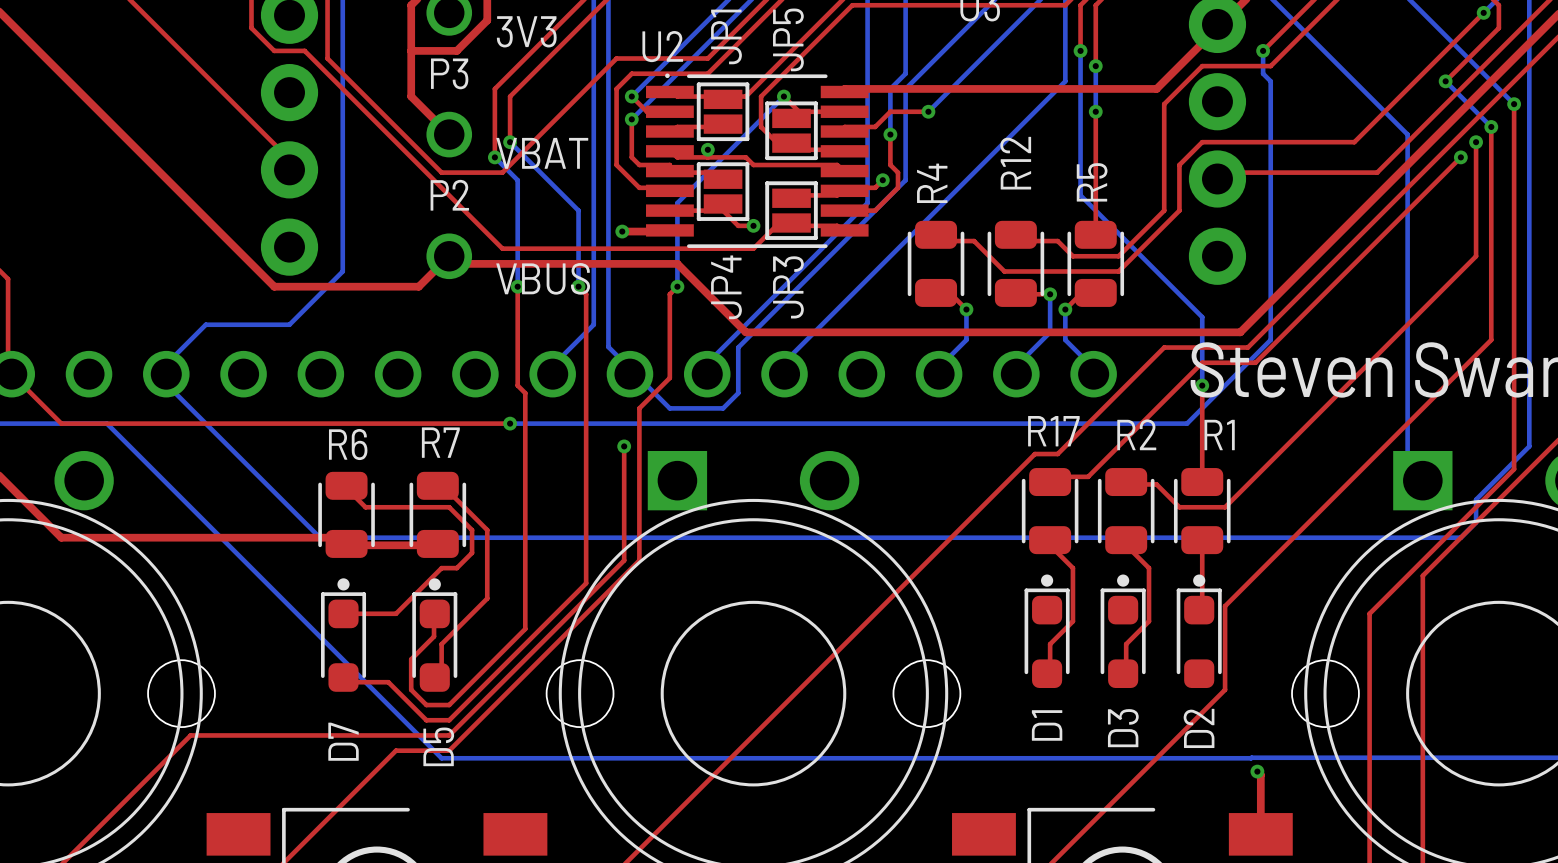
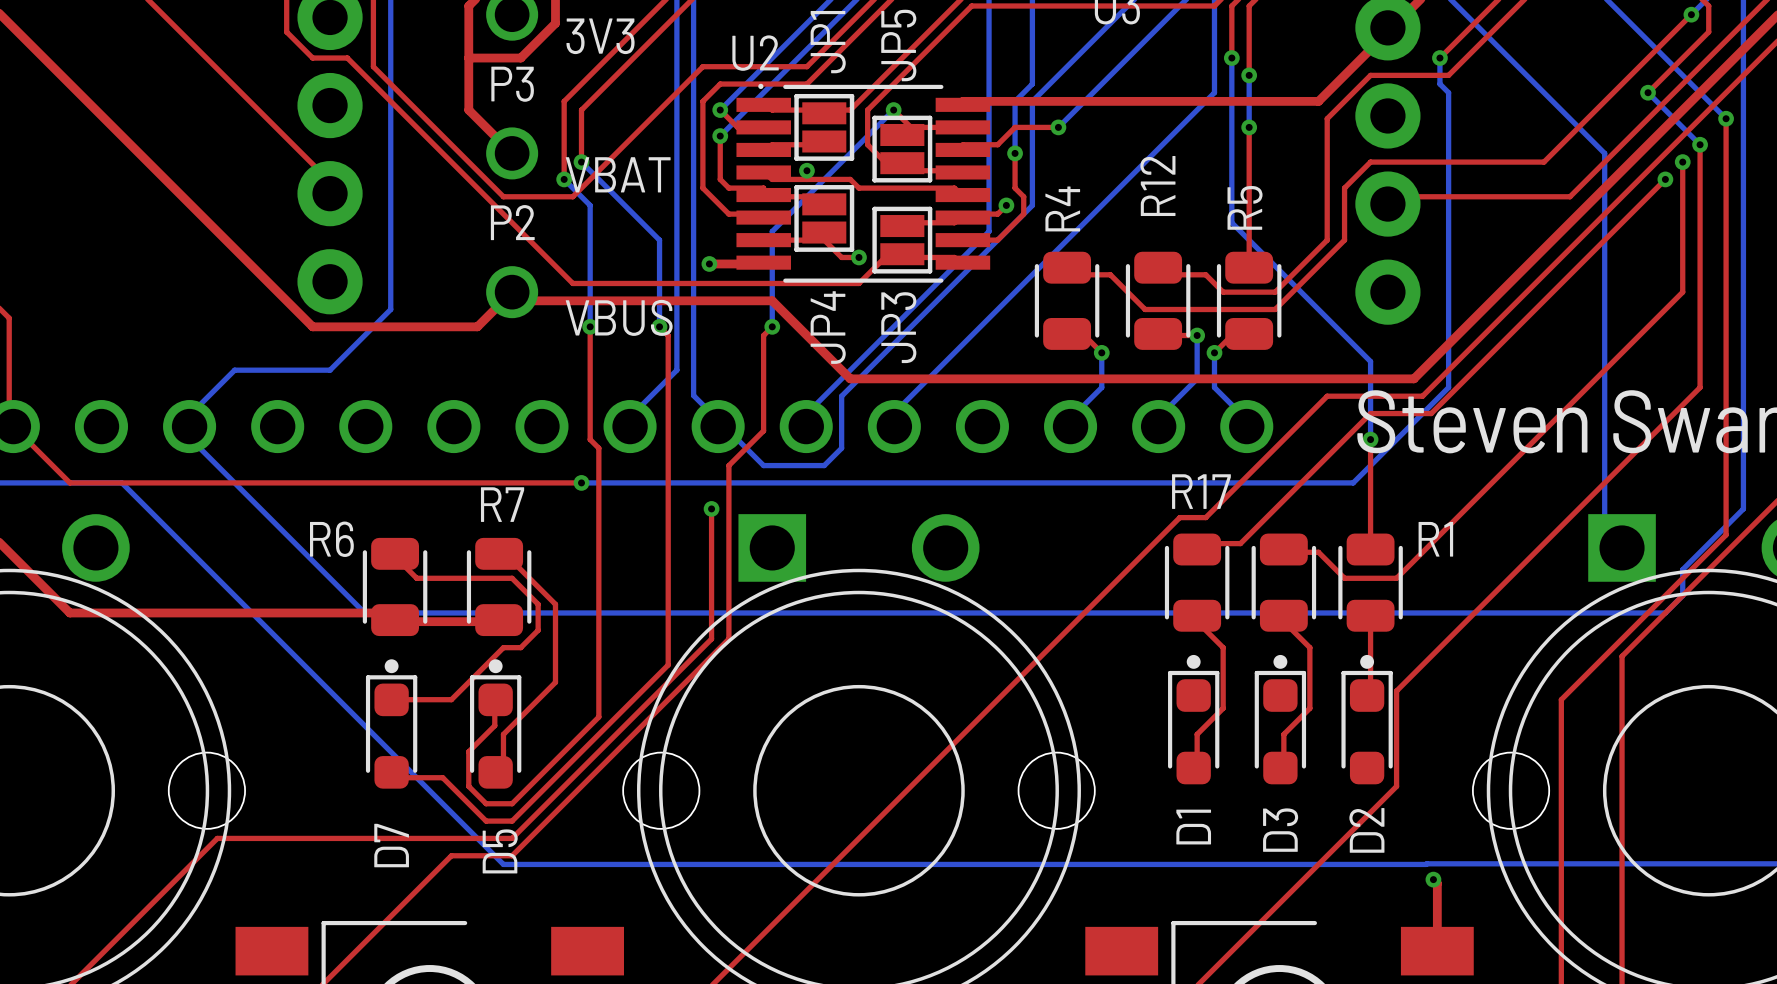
R2 name: R2 (1136, 434) -> none
R1 name position: R1 (1219, 435) -> R1 (1435, 539)
R6 name position: R6 (348, 444) -> R6 (331, 539)

